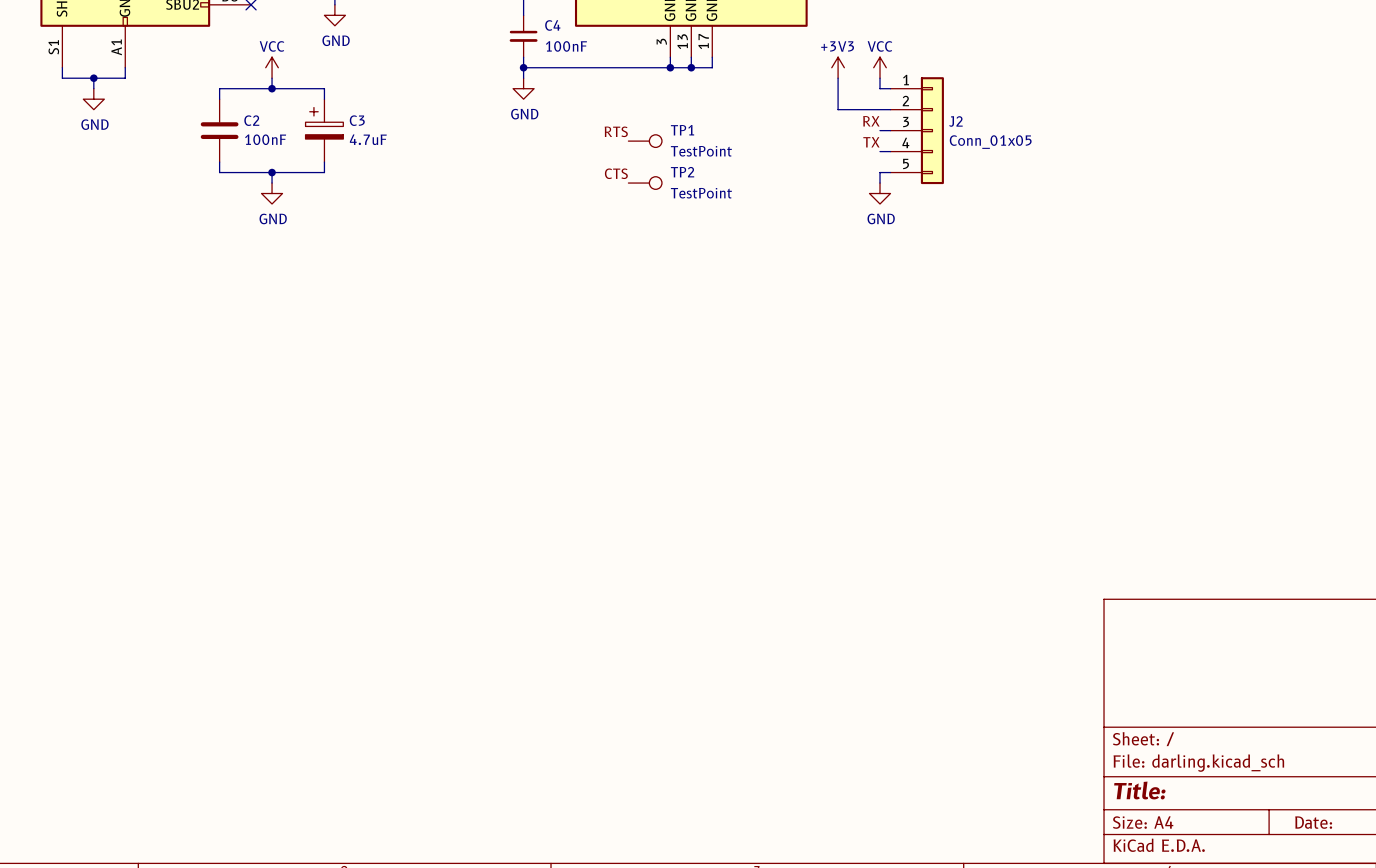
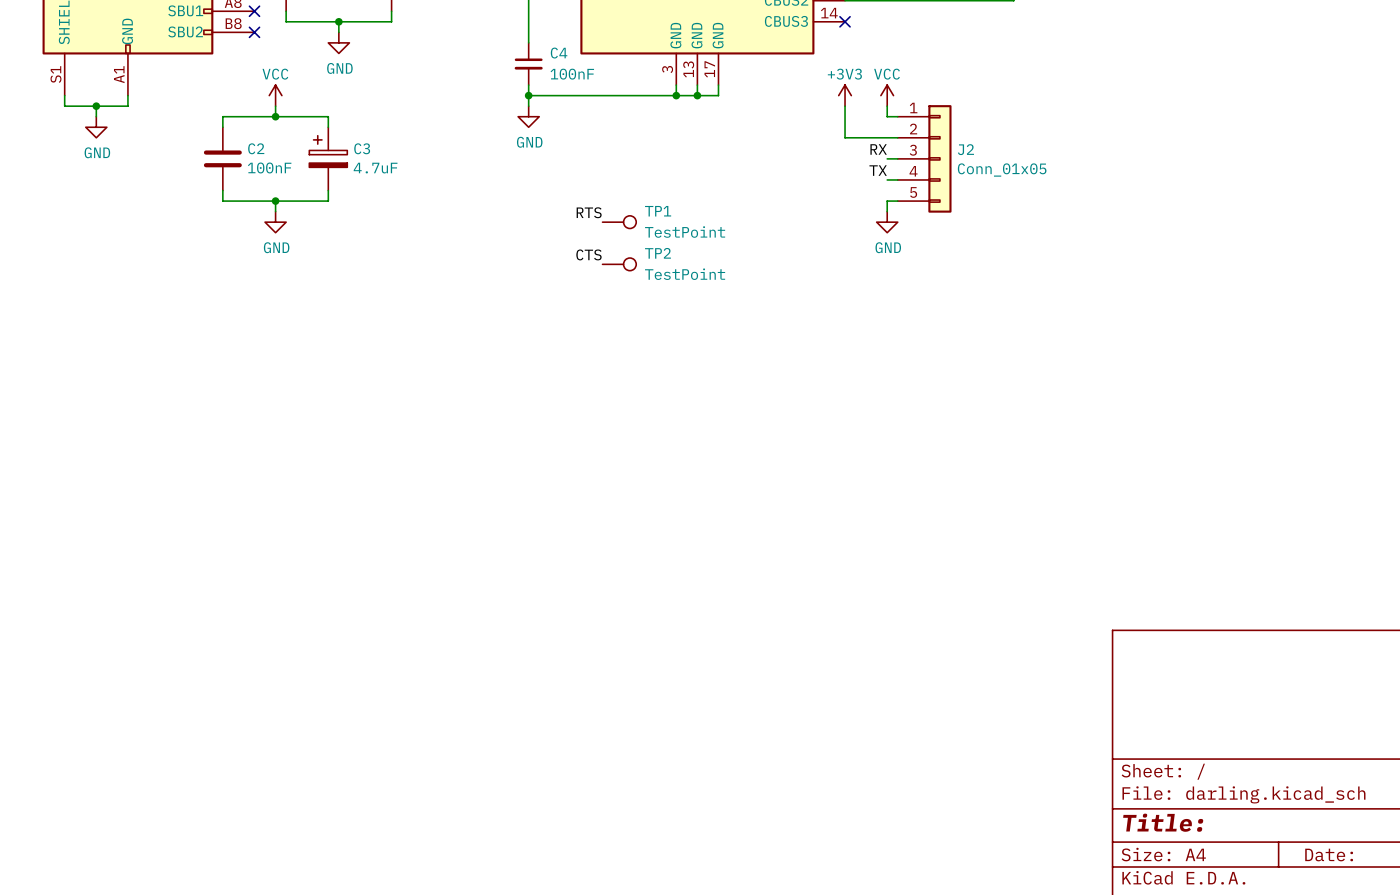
label position: RTS (616, 131) -> RTS (589, 212)
TP1 position: (645, 141) -> (619, 222)
label position: CTS (616, 173) -> CTS (588, 254)
TP2 position: (645, 183) -> (619, 264)

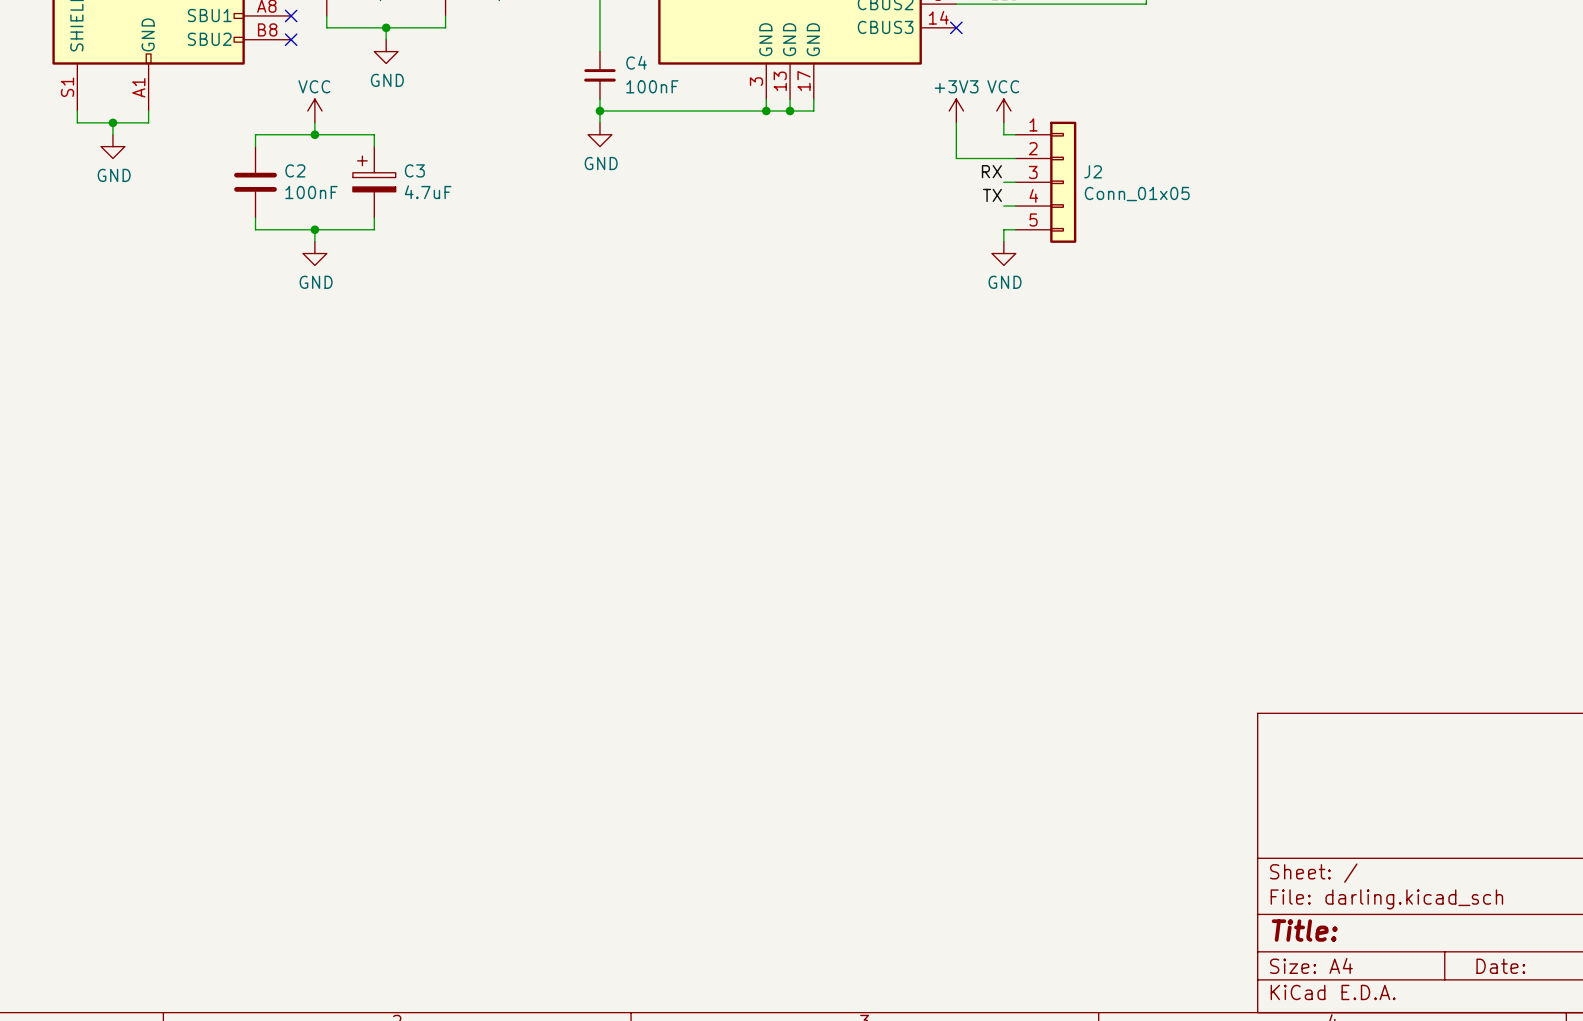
label: RTS (589, 212) -> none
TP1: TestPoint (619, 222) -> none
label: CTS (588, 254) -> none
TP2: TestPoint (619, 264) -> none

